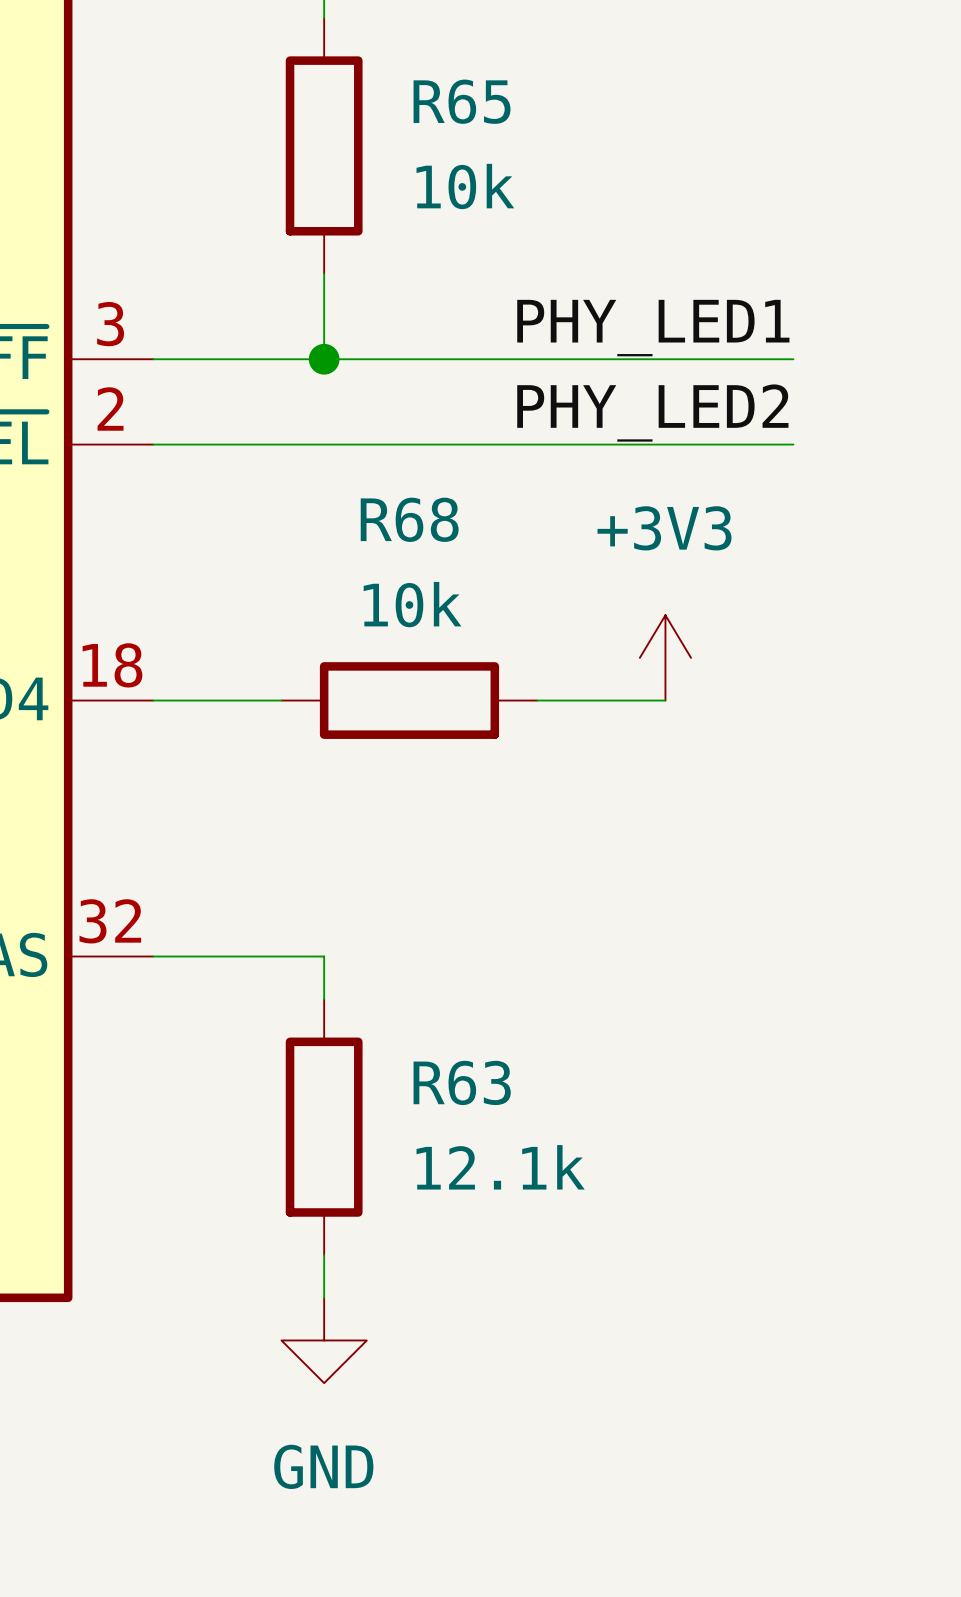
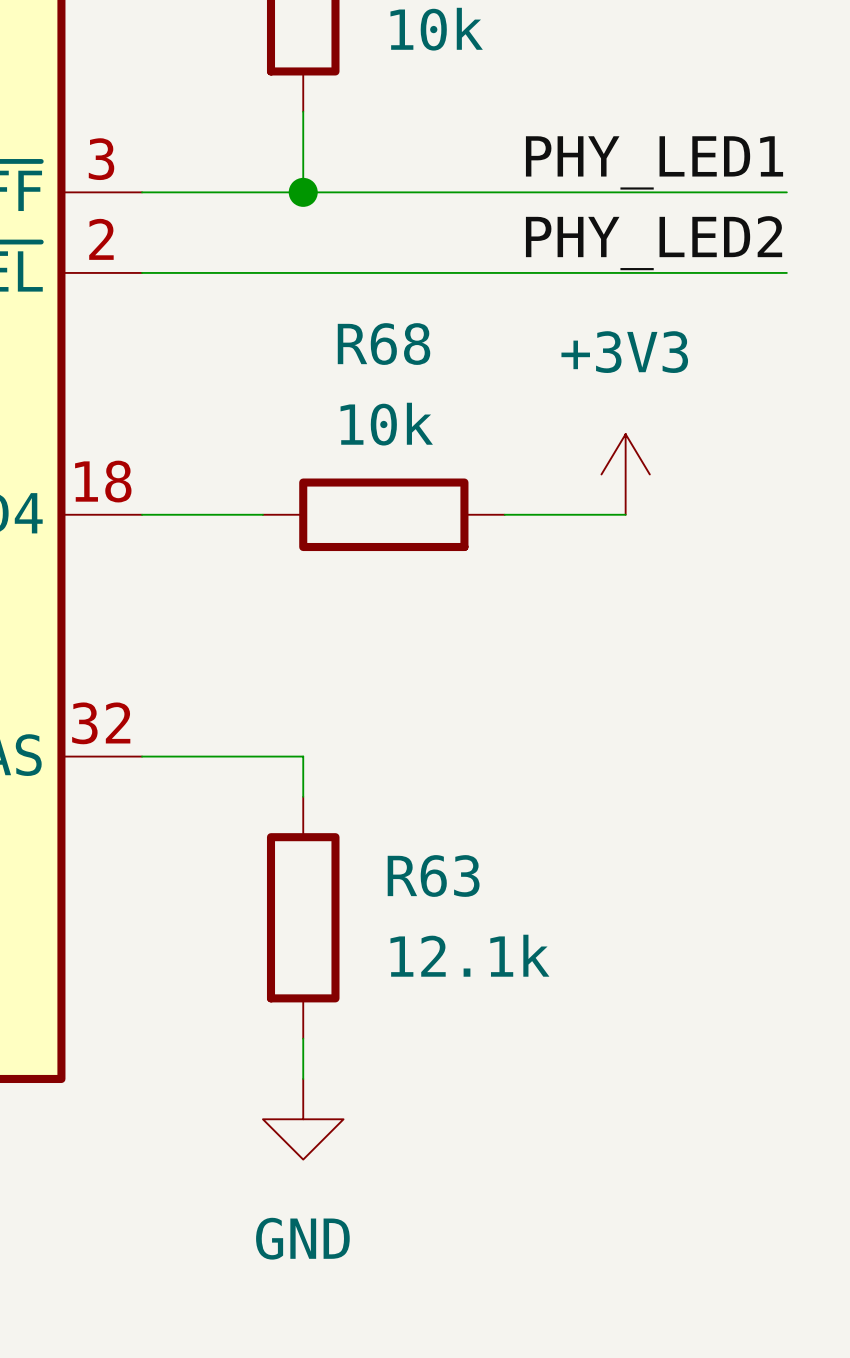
label position: PHY_LED1 (653, 328) -> PHY_LED1 (654, 162)
wire: none -> (746, 192) (786, 192)
label position: PHY_LED2 (652, 413) -> PHY_LED2 (654, 243)
wire: none -> (746, 272) (786, 272)

